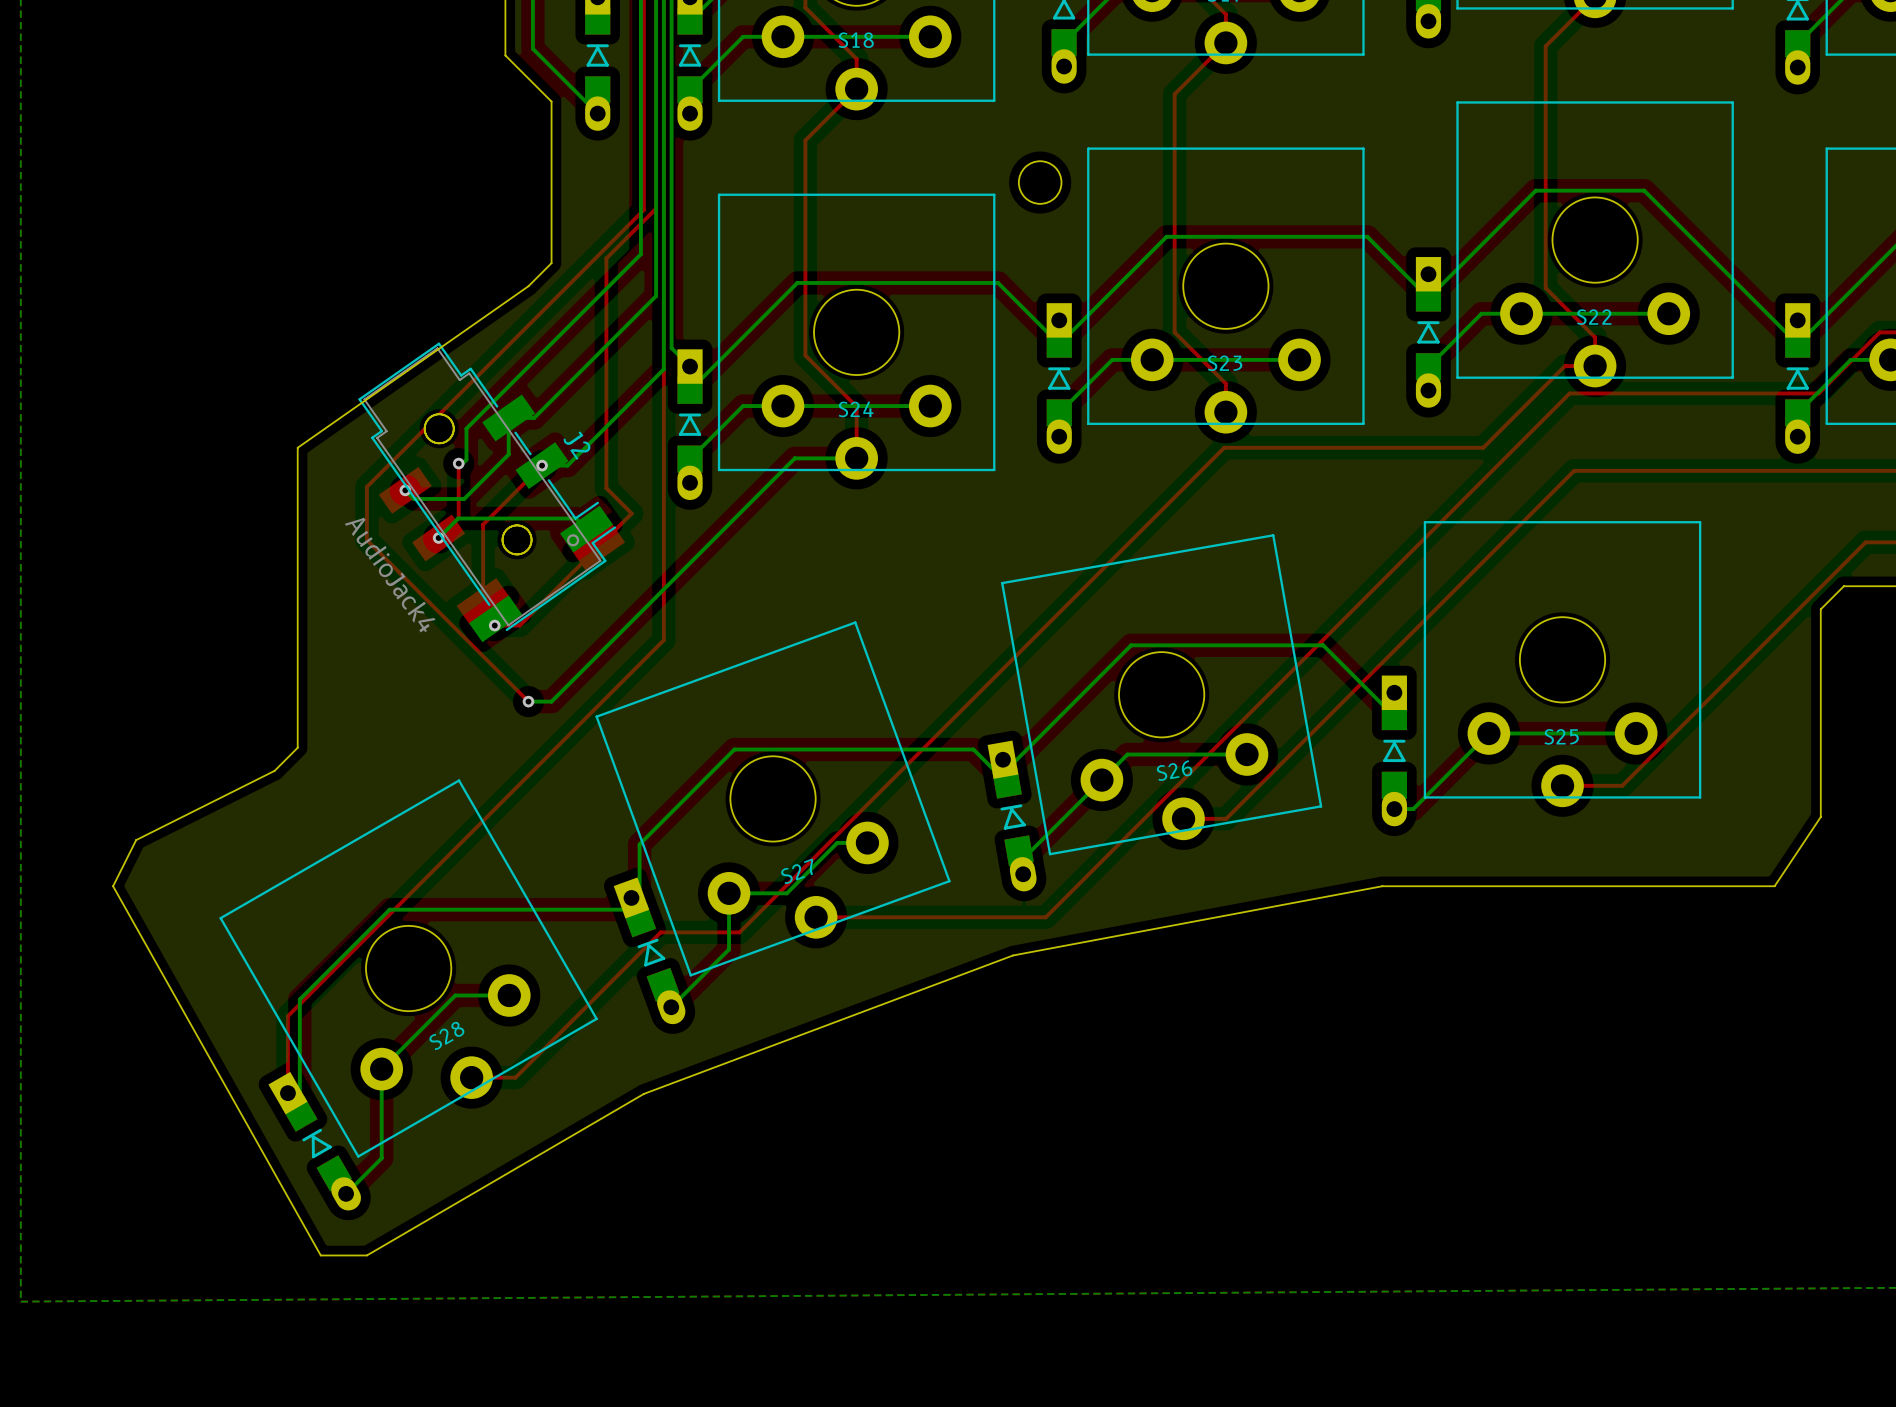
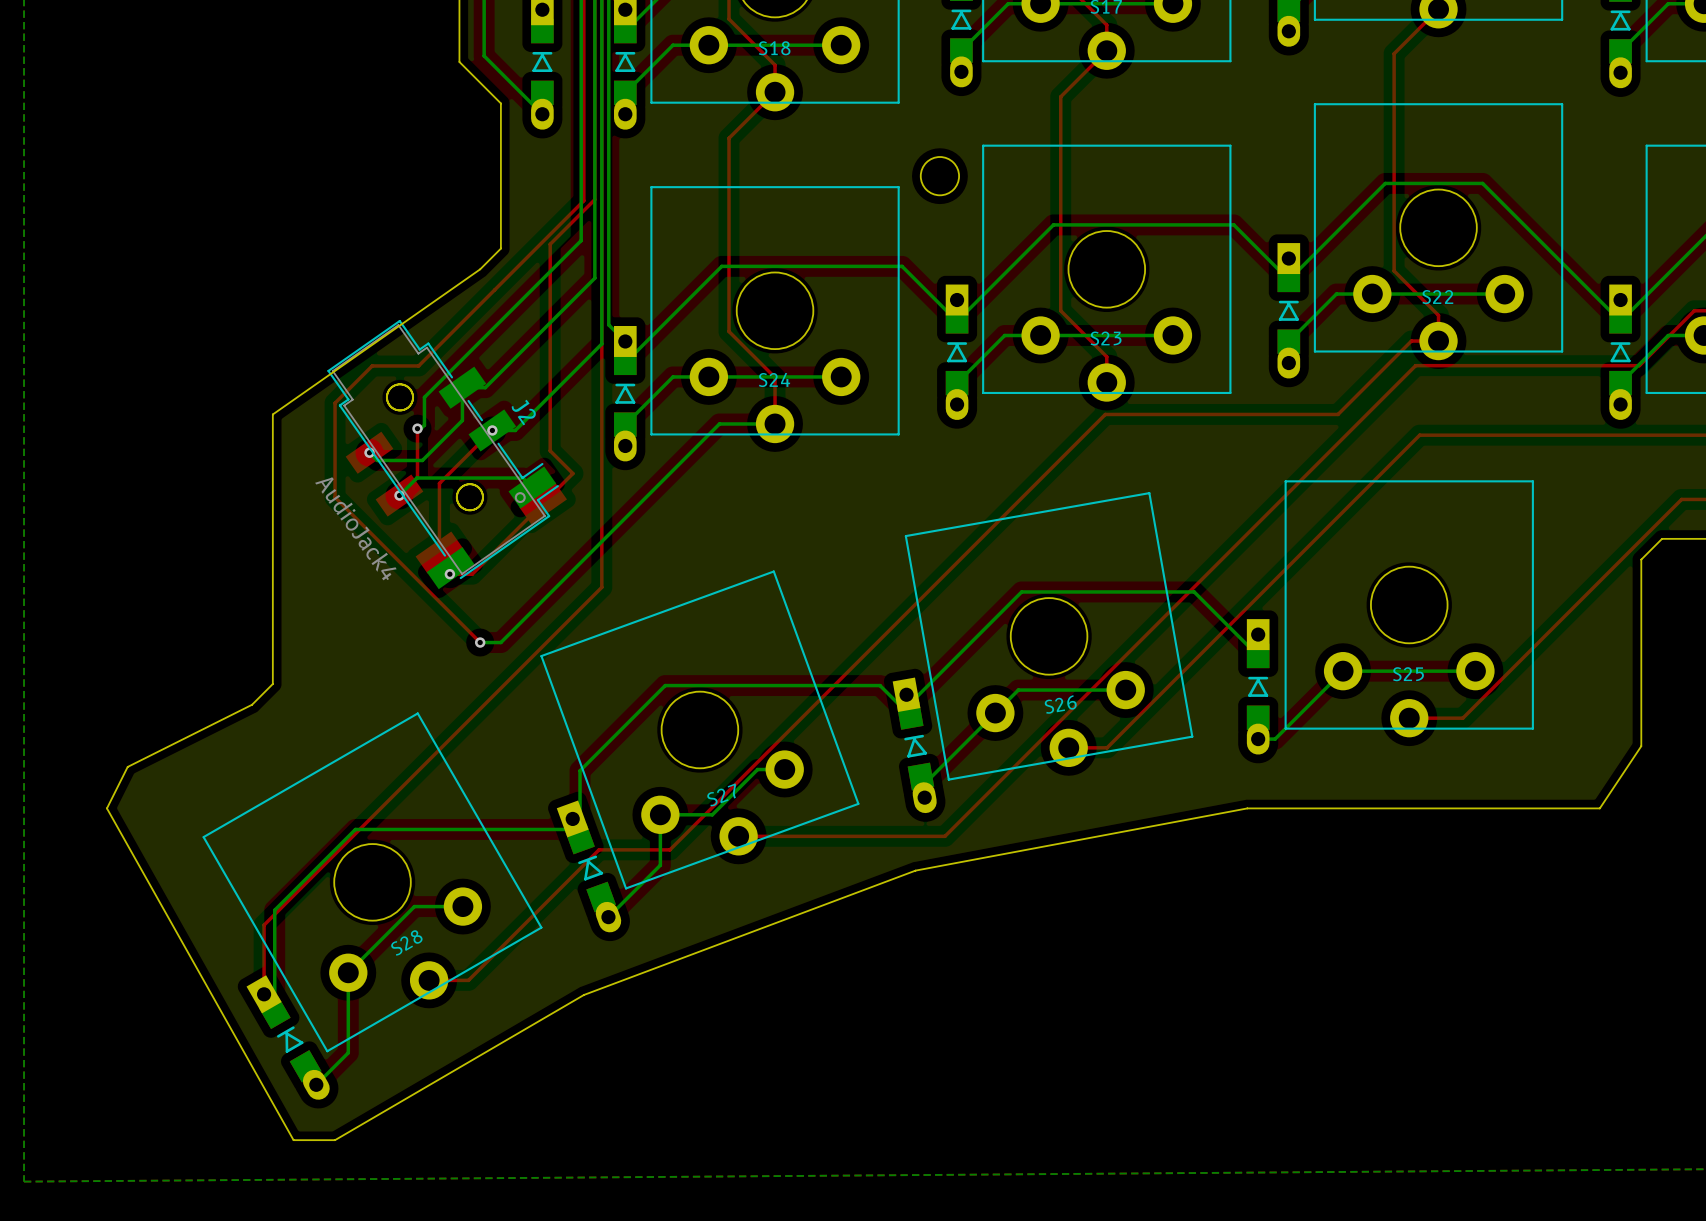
top track: (459, 393) (366, 486) -> (418, 365) (372, 365) (335, 403) (335, 449)

